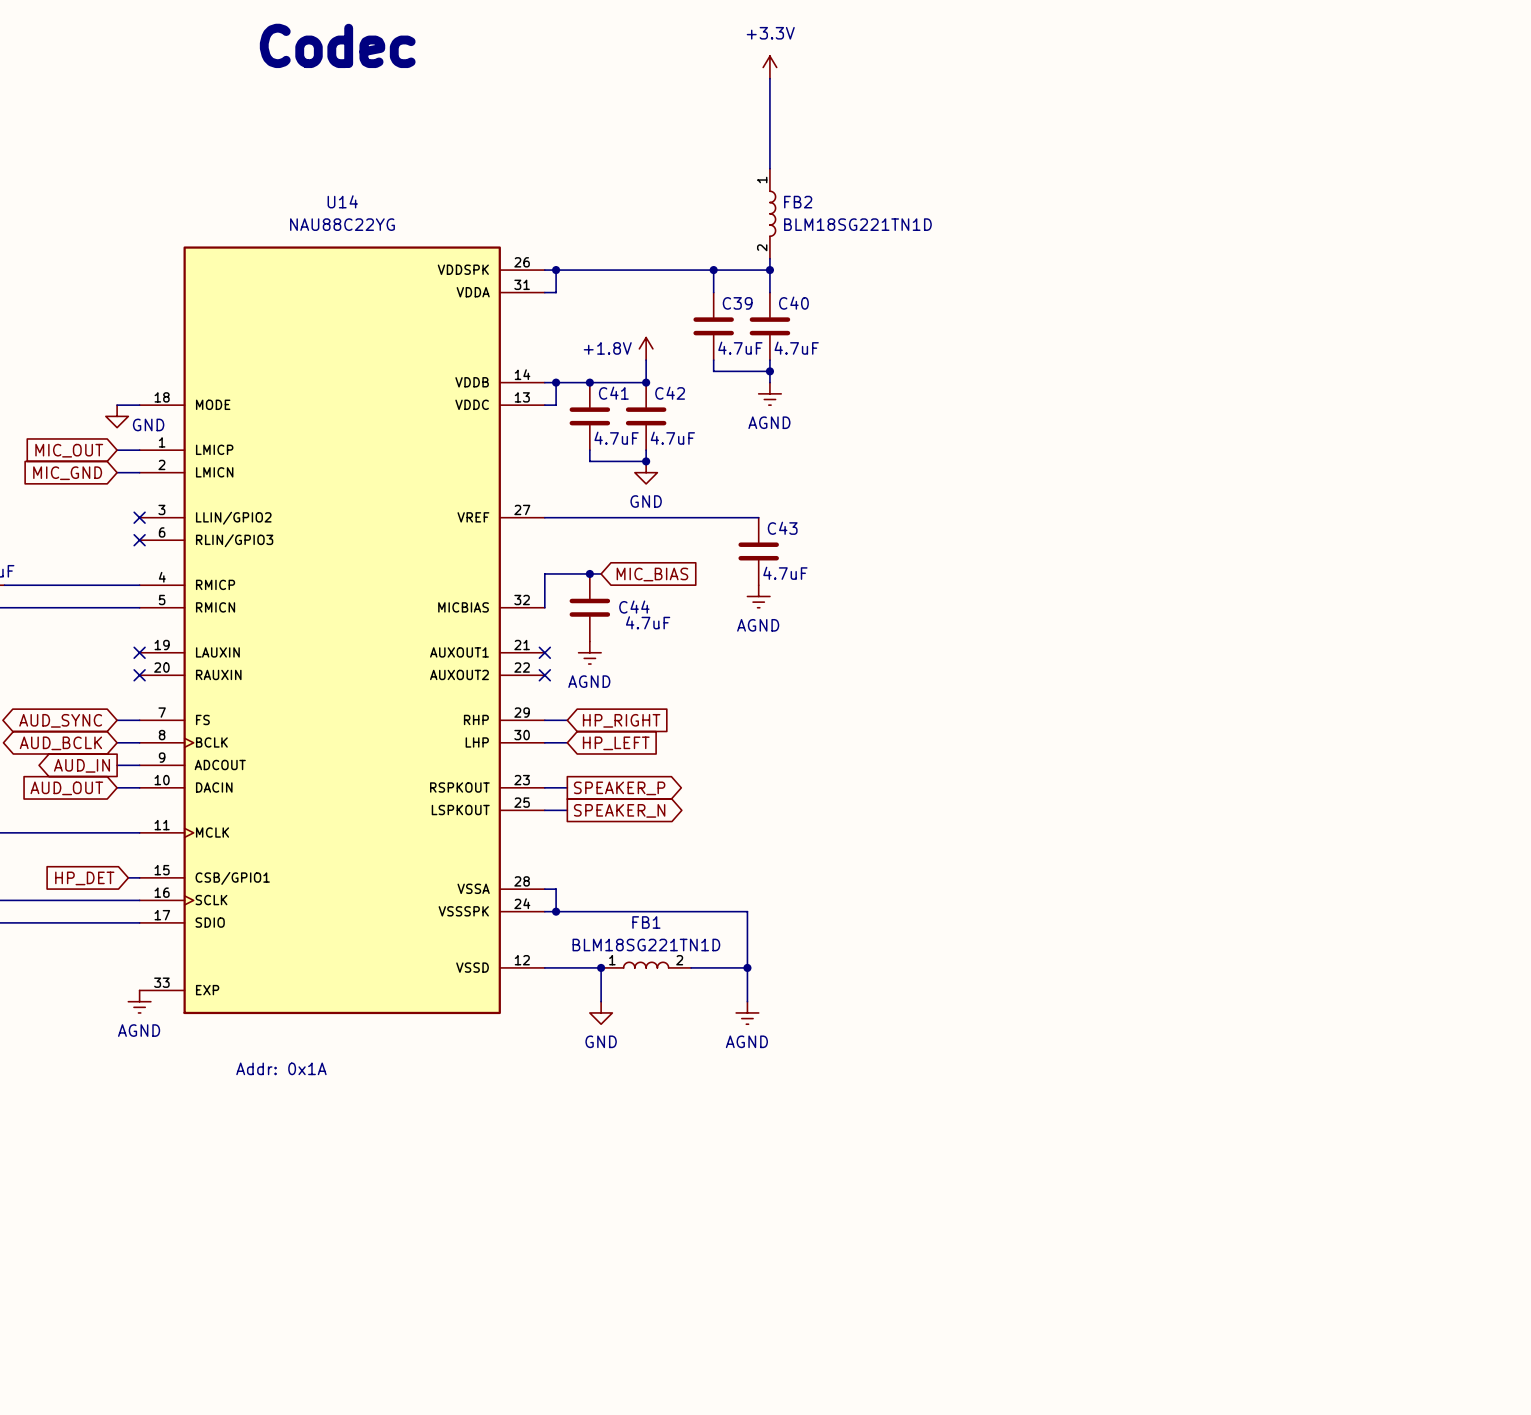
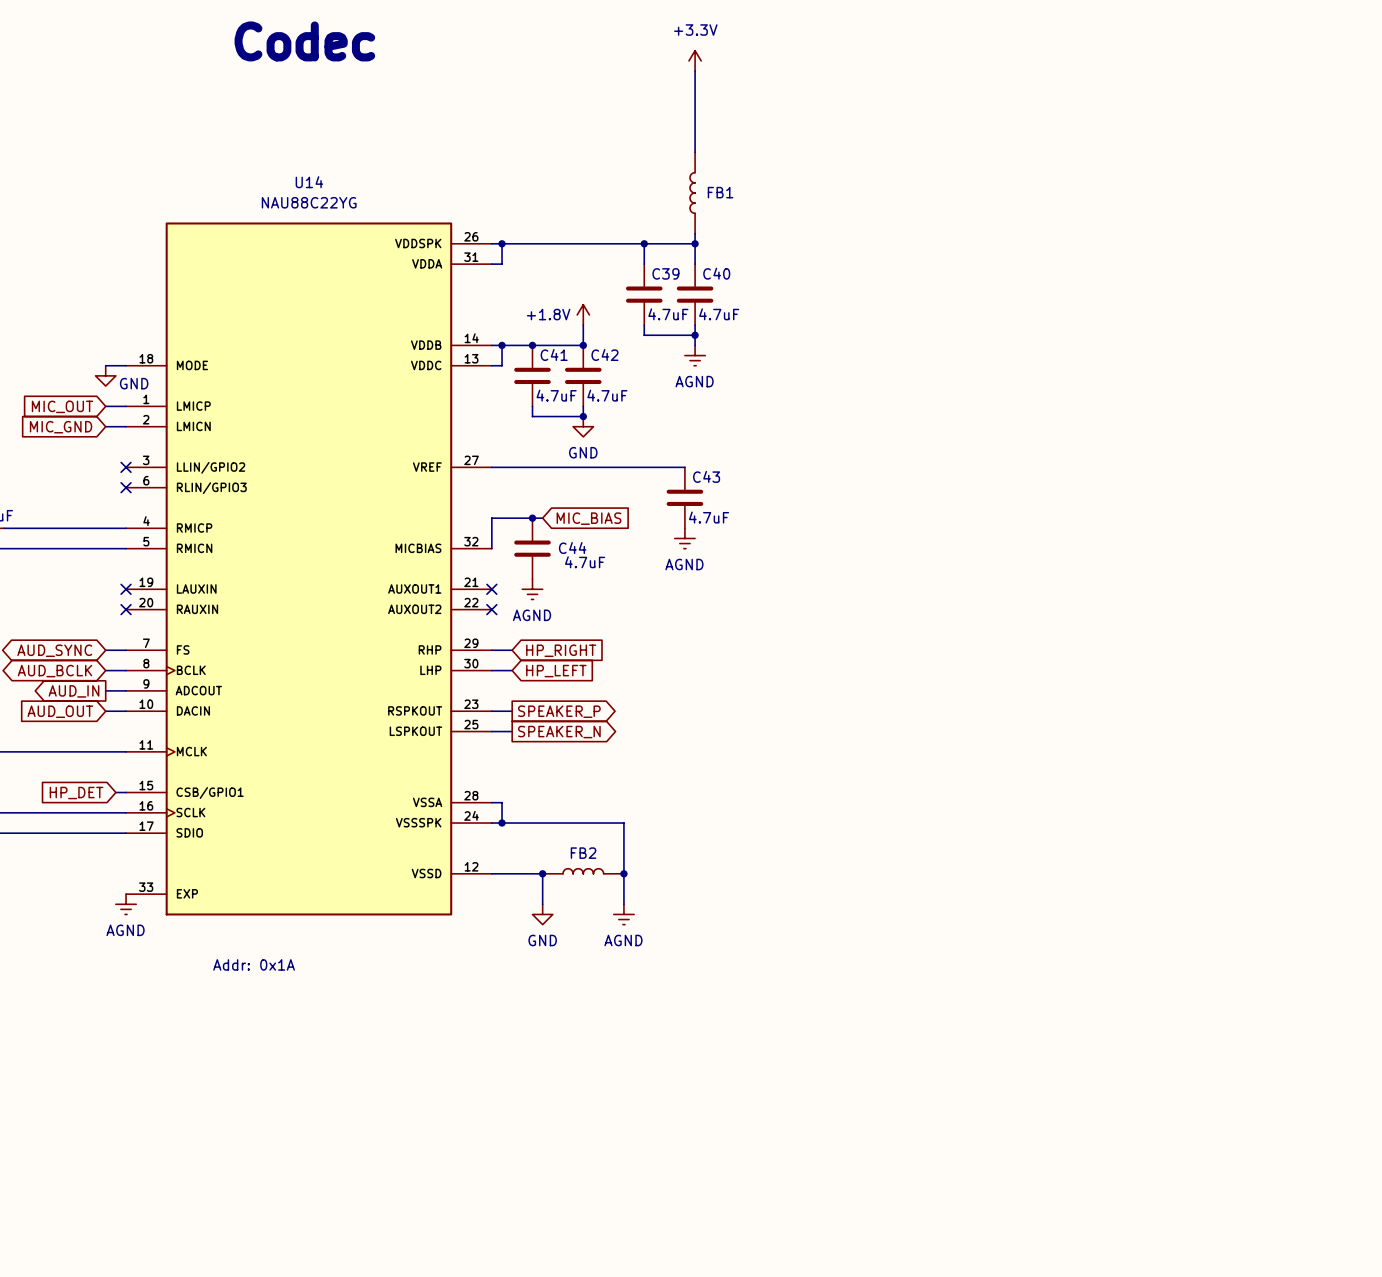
FB2 symbol: [769, 168, 776, 259] -> [542, 868, 624, 874]
FB2 name position: FB2 (798, 202) -> FB2 (583, 853)
FB2 value: BLM18SG221TN1D (857, 224) -> none
wire: (691, 911) (747, 911) (747, 1001) -> (623, 823) (623, 904)
FB1 name position: FB1 (646, 922) -> FB1 (720, 192)
FB1 value: BLM18SG221TN1D (646, 945) -> none
FB1 symbol: [601, 962, 692, 968] -> [689, 152, 696, 234]
wire: (691, 967) (747, 967) -> none
junction: none -> (623, 873)
junction: (747, 967) -> none
power symbol position: AGND (747, 1012) -> AGND (623, 914)

